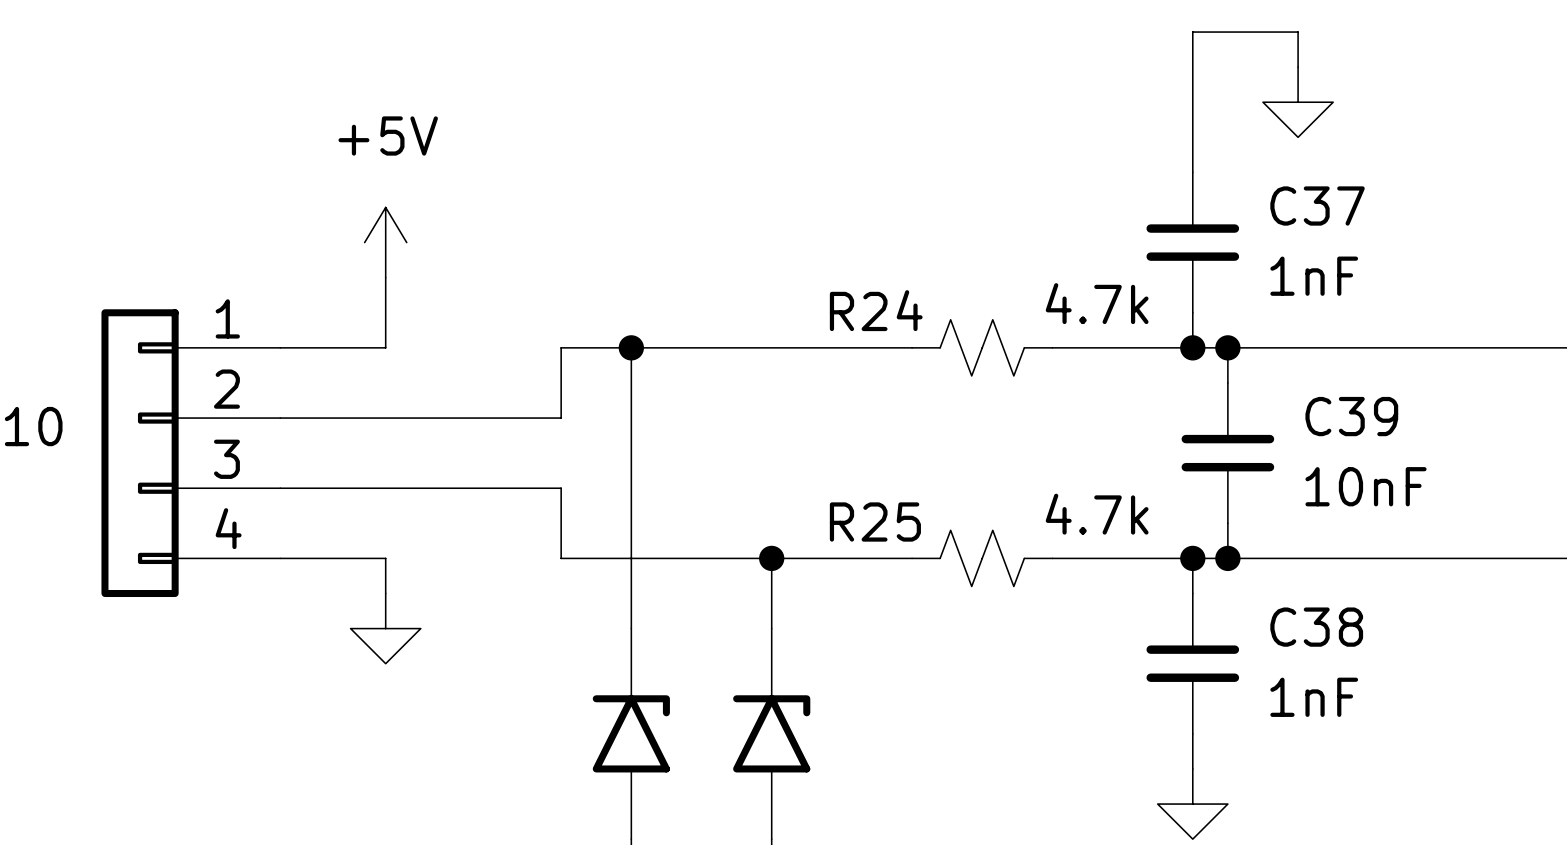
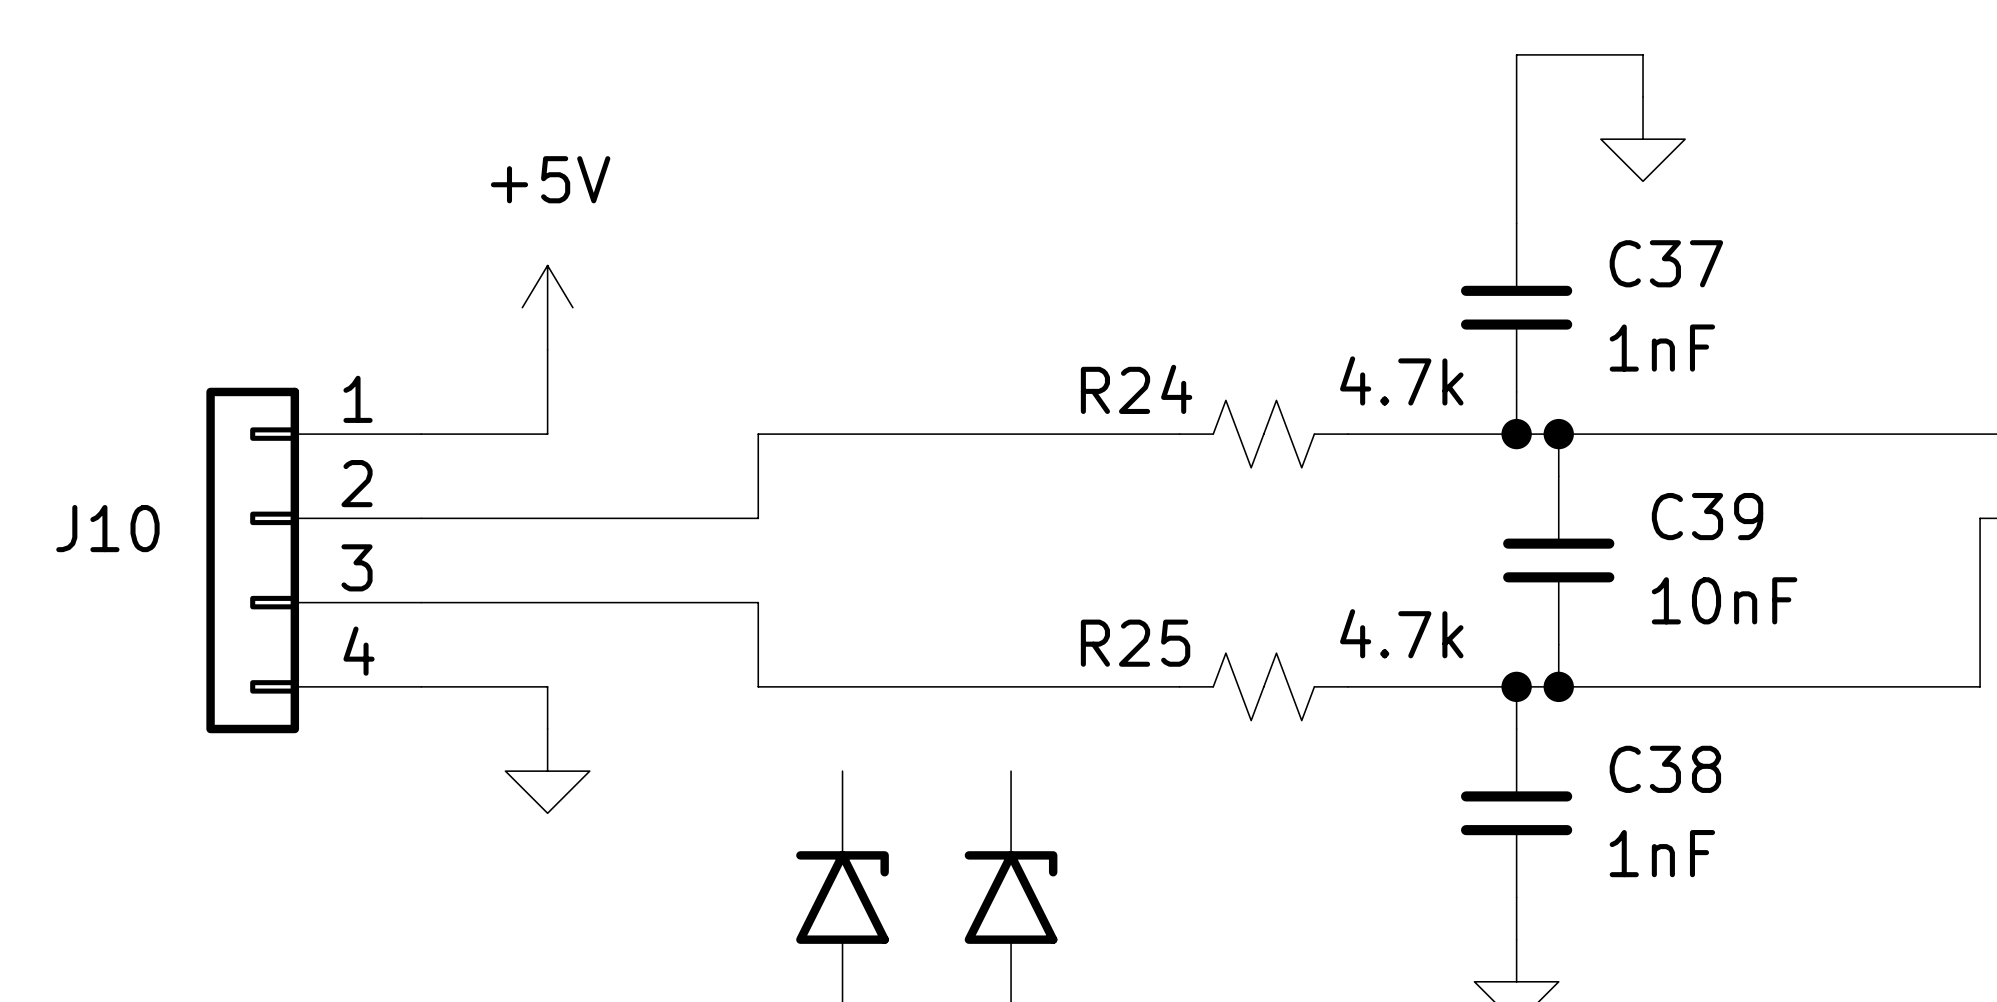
wire: (631, 347) (631, 628) -> none
junction: (631, 347) -> none
wire: (771, 558) (771, 628) -> none
junction: (771, 558) -> none

